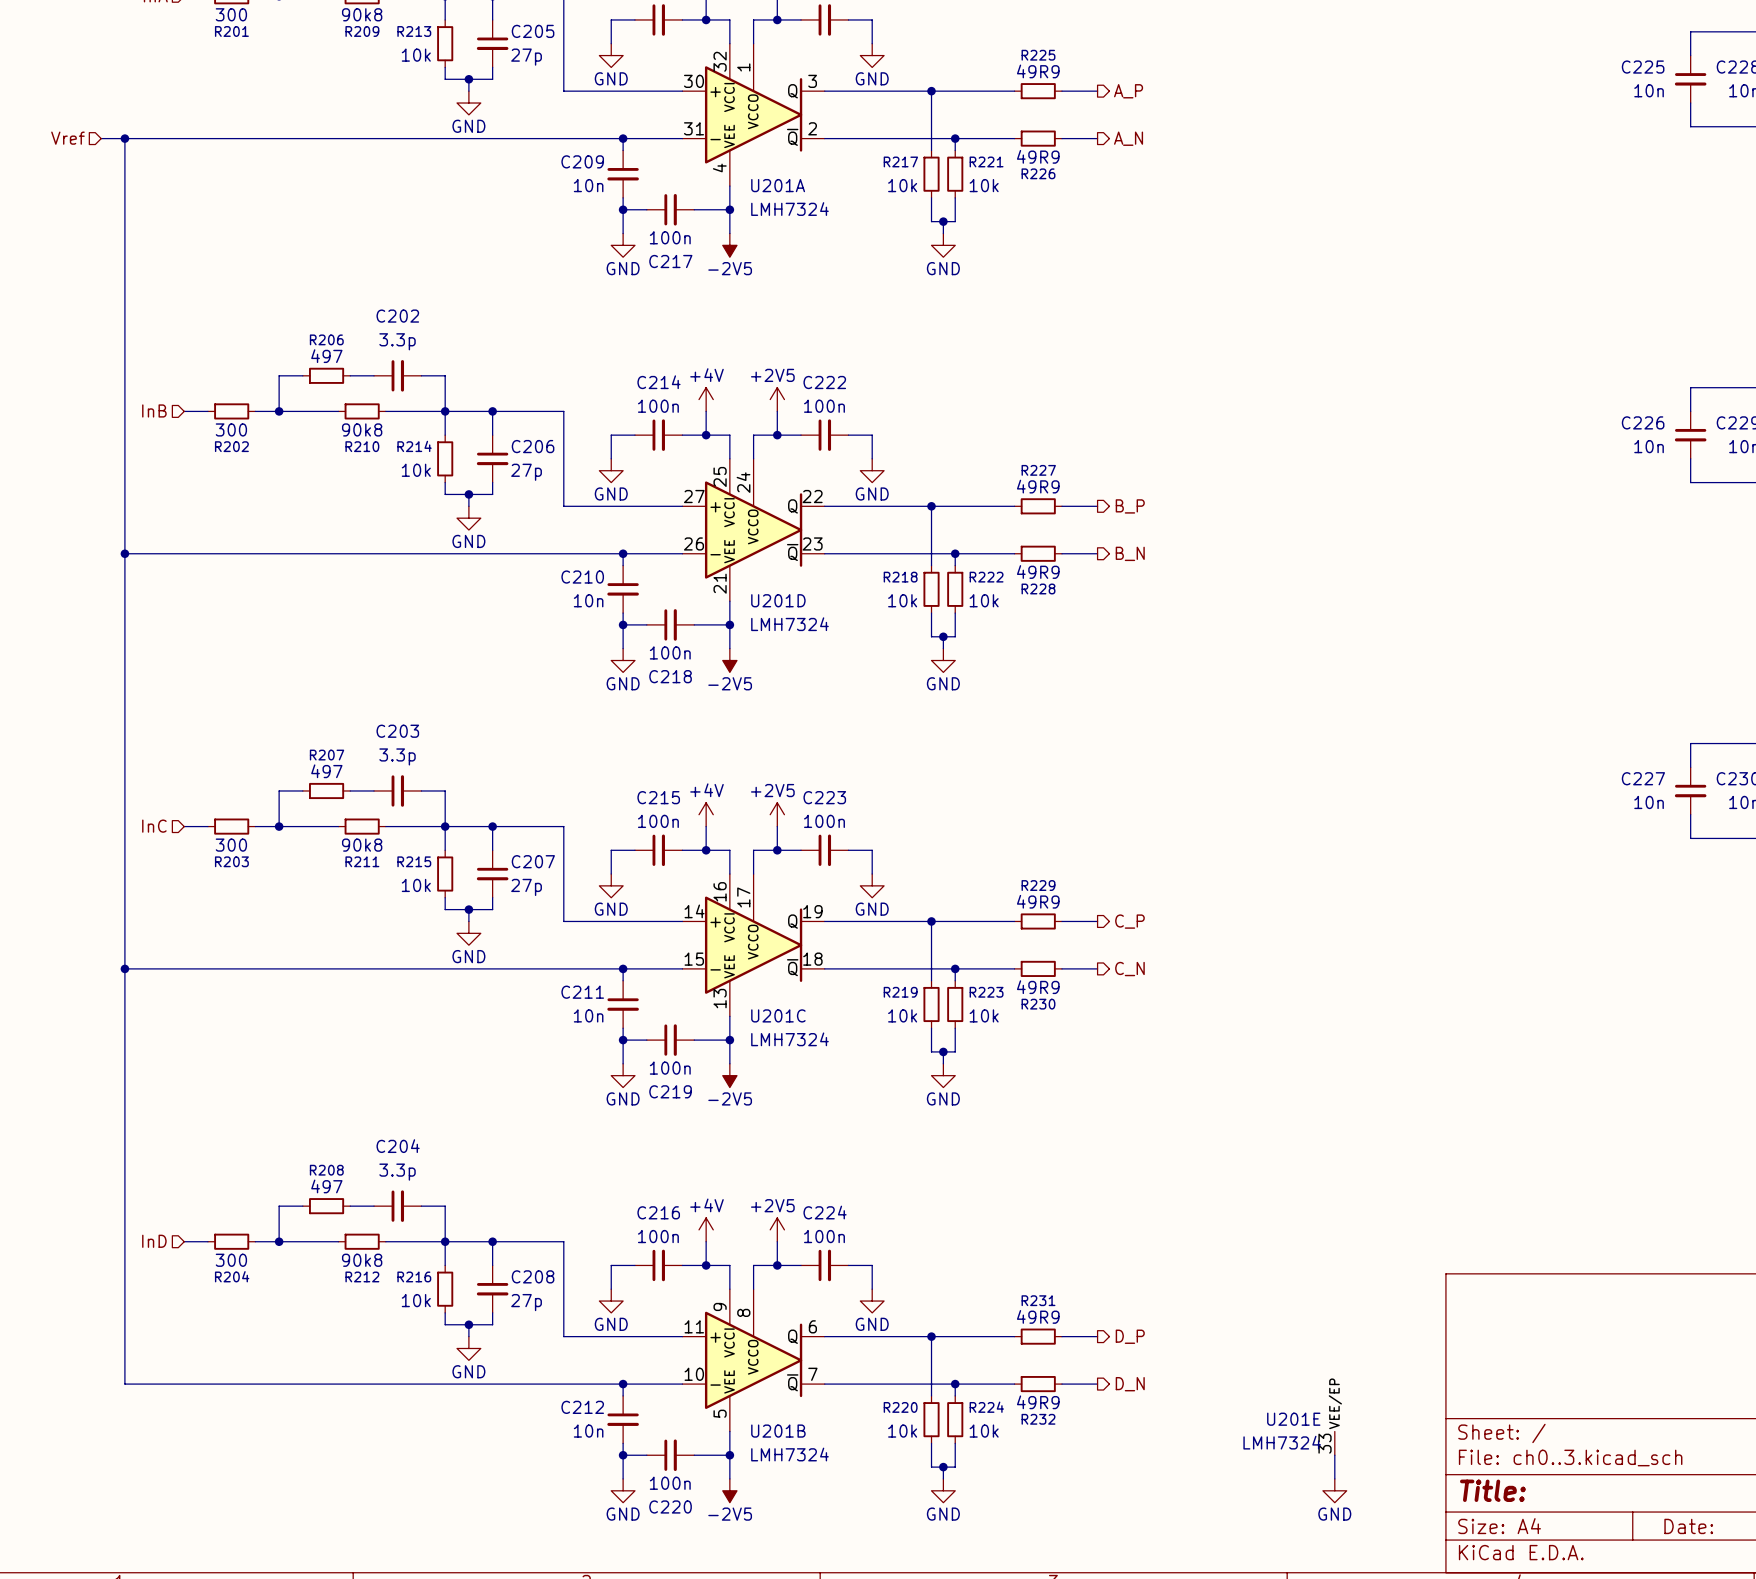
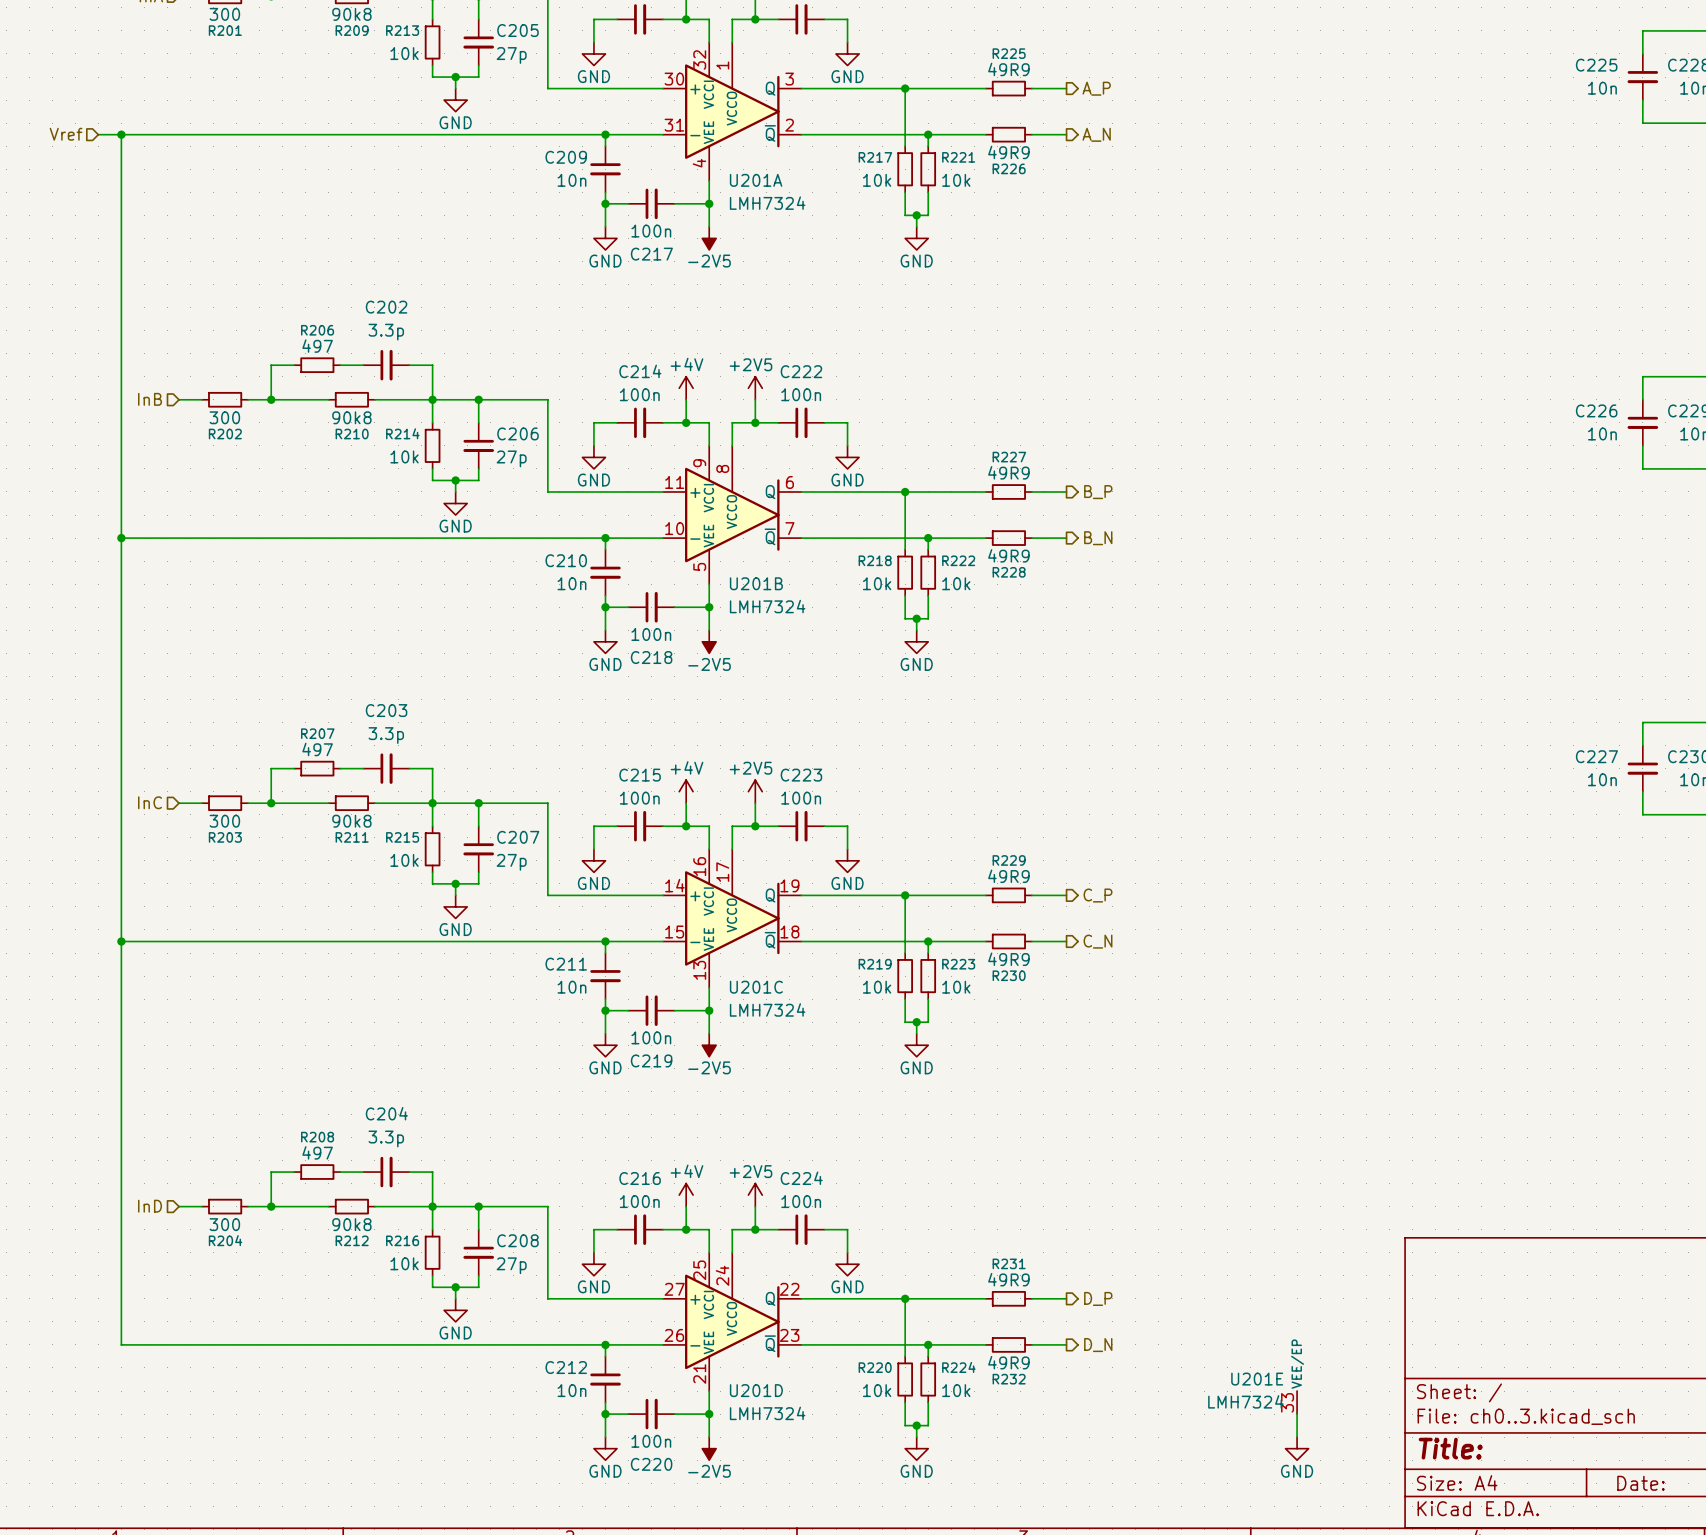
U201D position: (753, 530) -> (732, 1321)
U201B position: (753, 1360) -> (732, 515)

